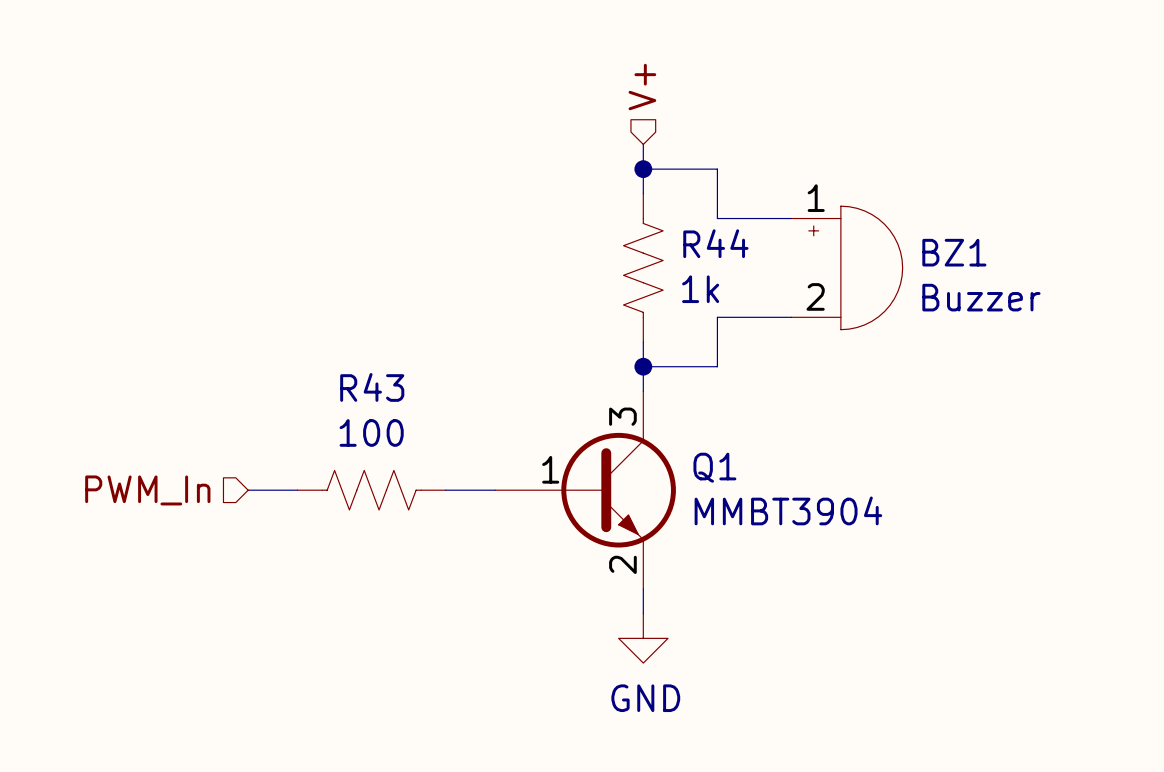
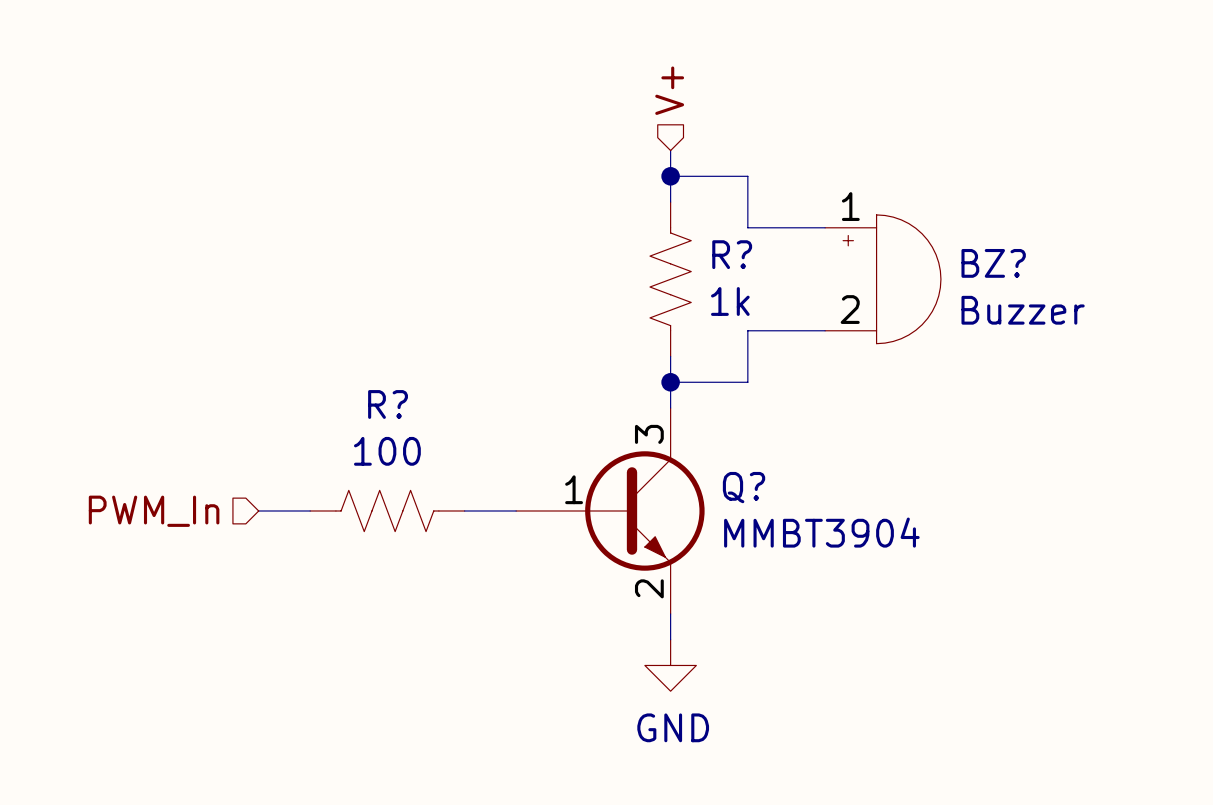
R44 name: R44 (715, 243) -> R? (732, 254)
BZ1 name: BZ1 (954, 252) -> BZ? (993, 263)
R43 name: R43 (372, 387) -> R? (388, 404)
Q1 name: Q1 (714, 467) -> Q? (744, 487)

